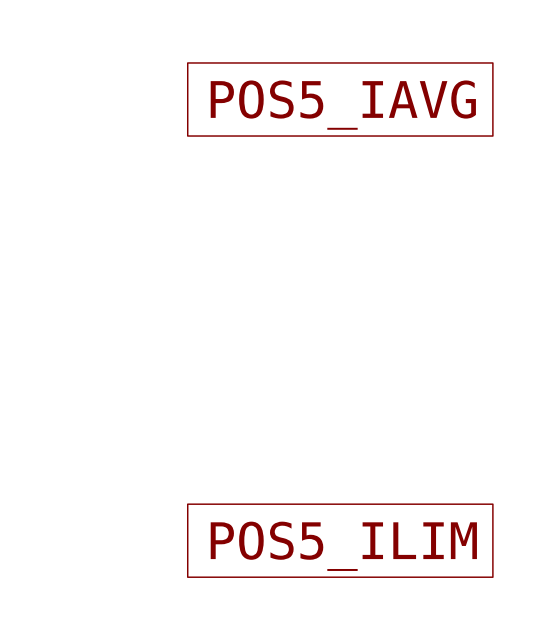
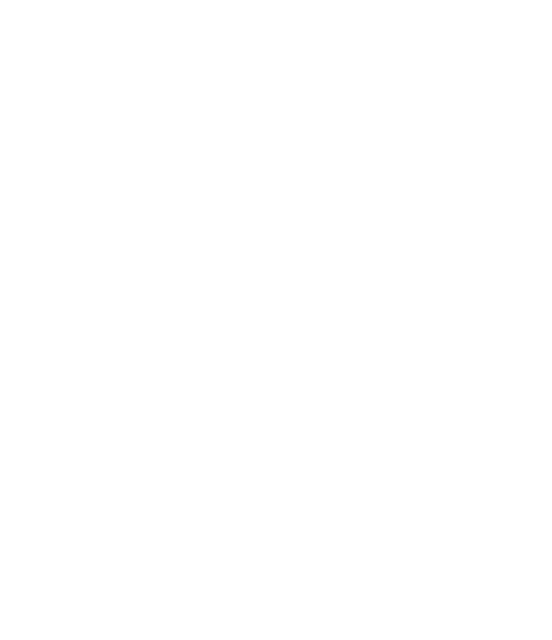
global label: POS5_IAVG (343, 105) -> none
global label: POS5_ILIM (343, 546) -> none

